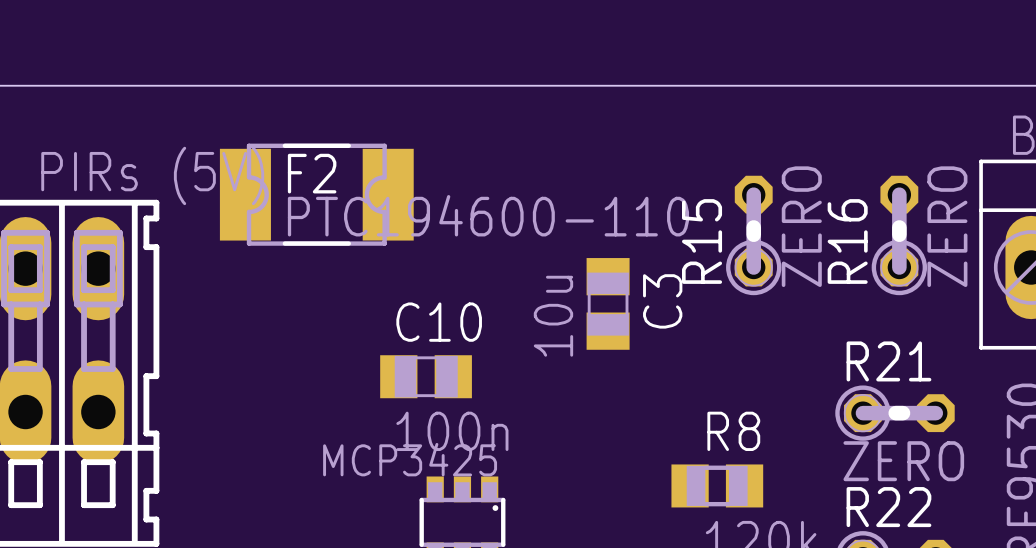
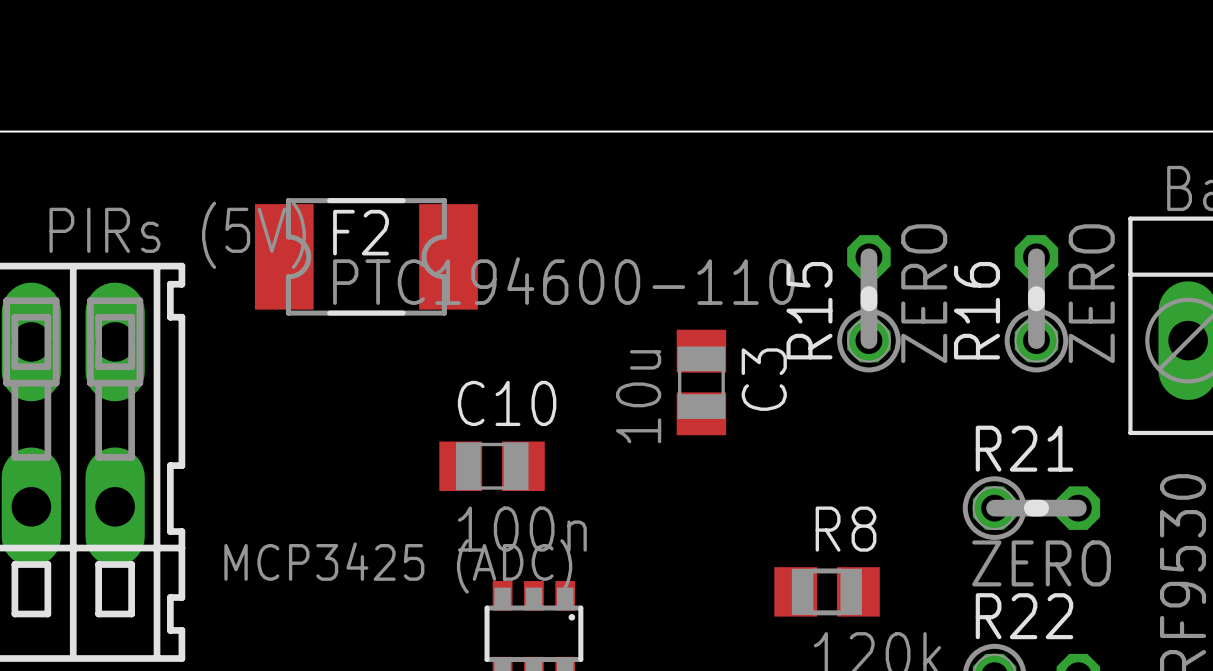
part value: MCP3425 (410, 459) -> MCP3425 (ADC) (398, 566)

